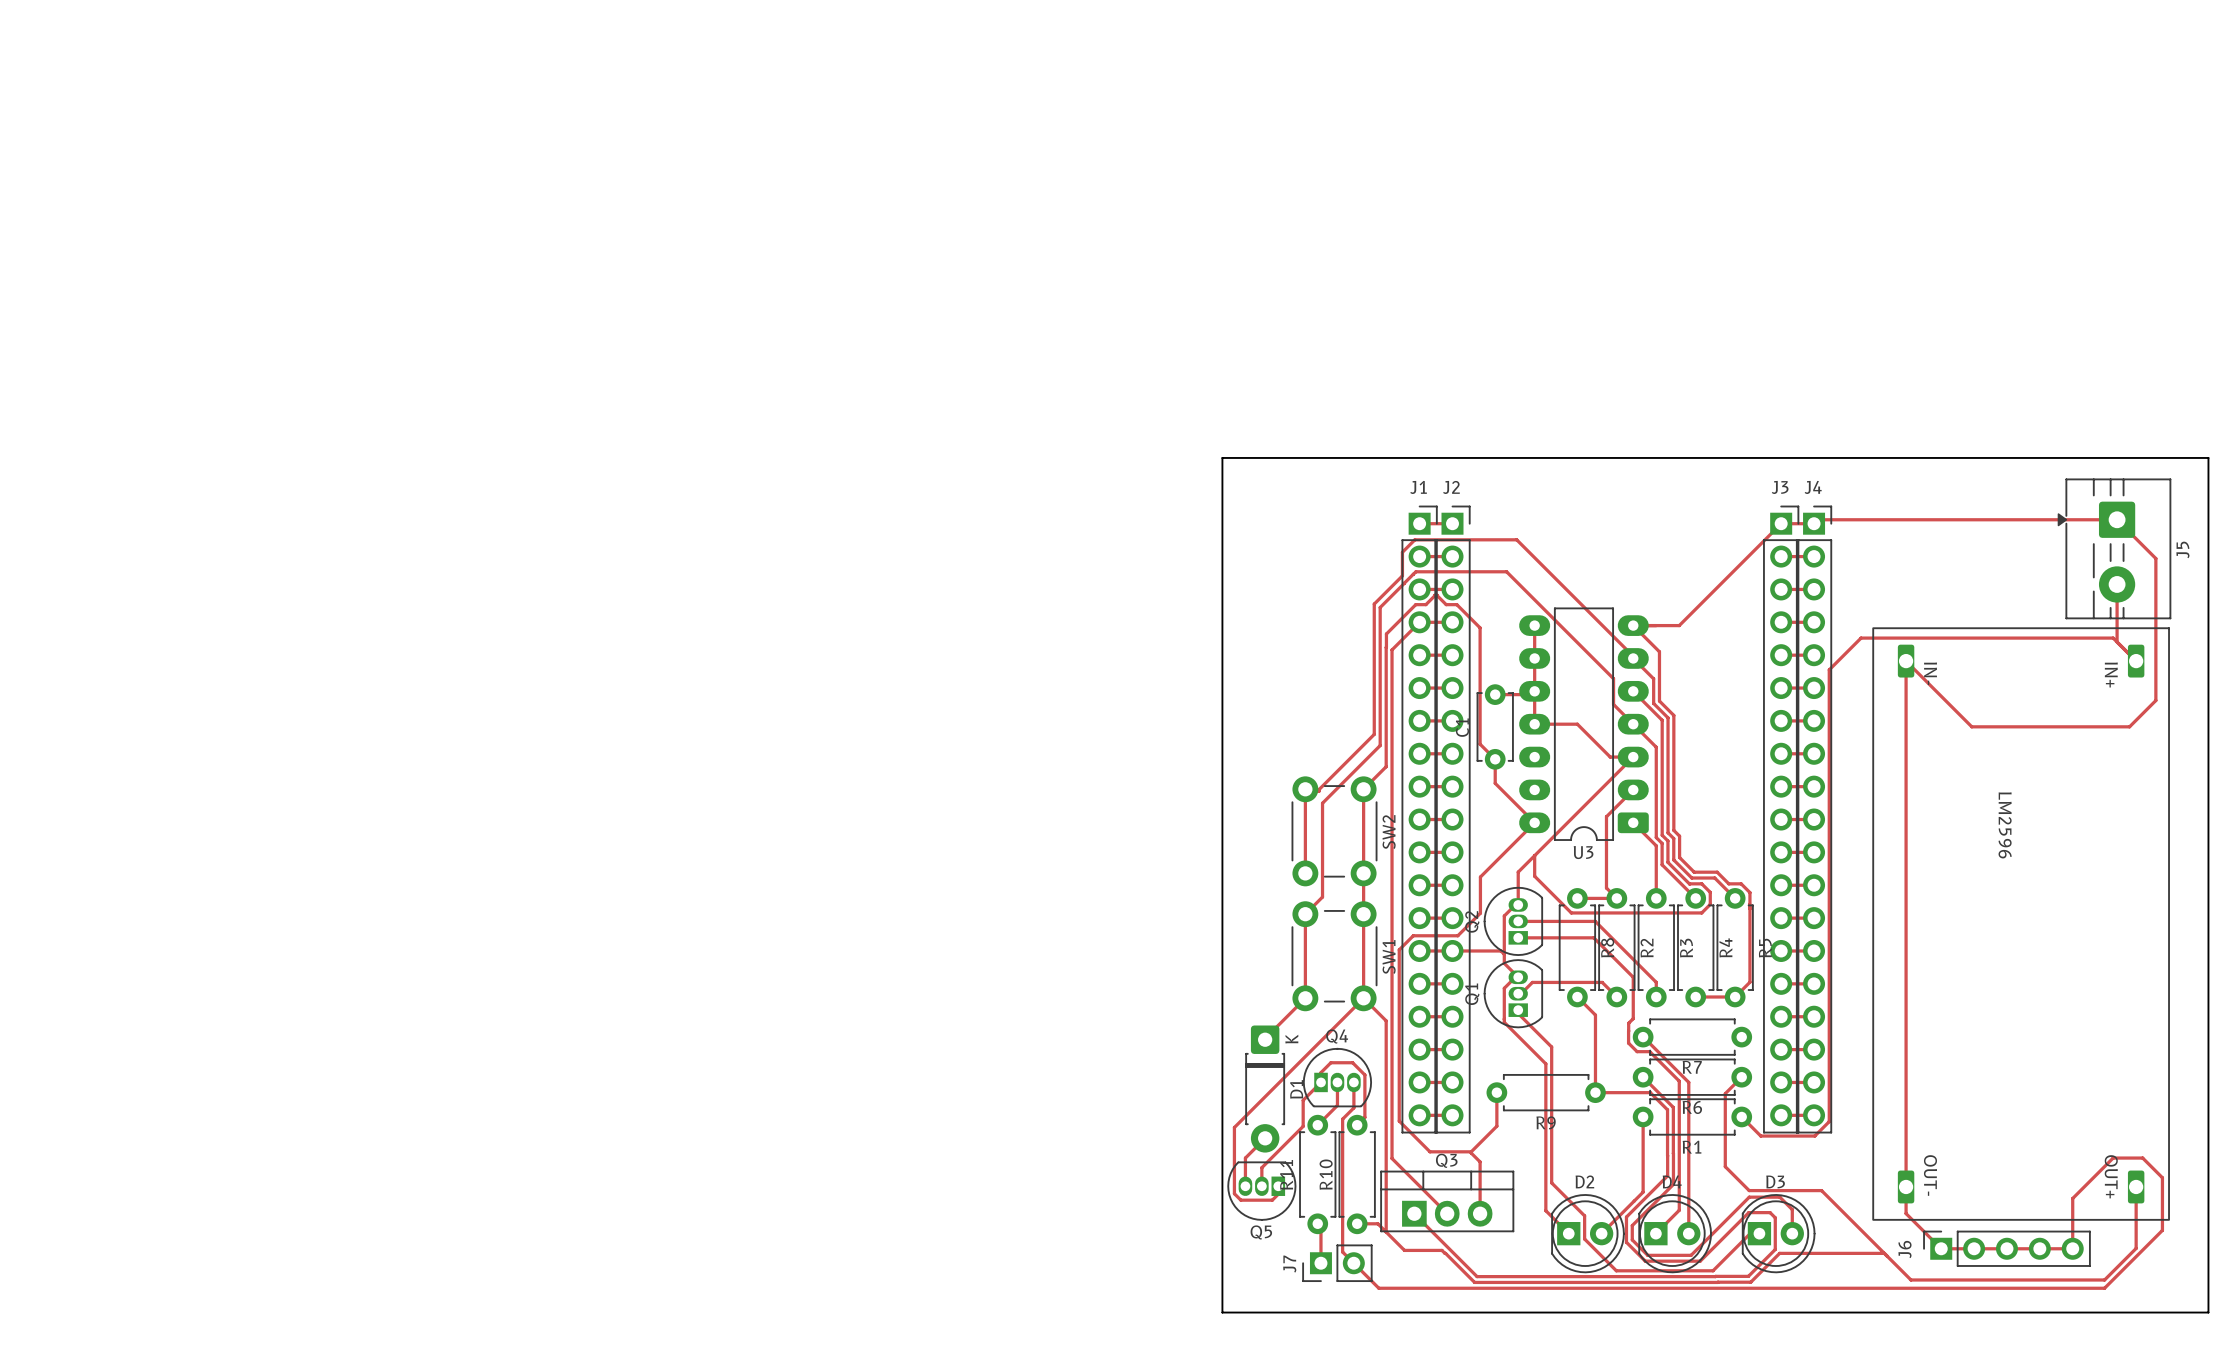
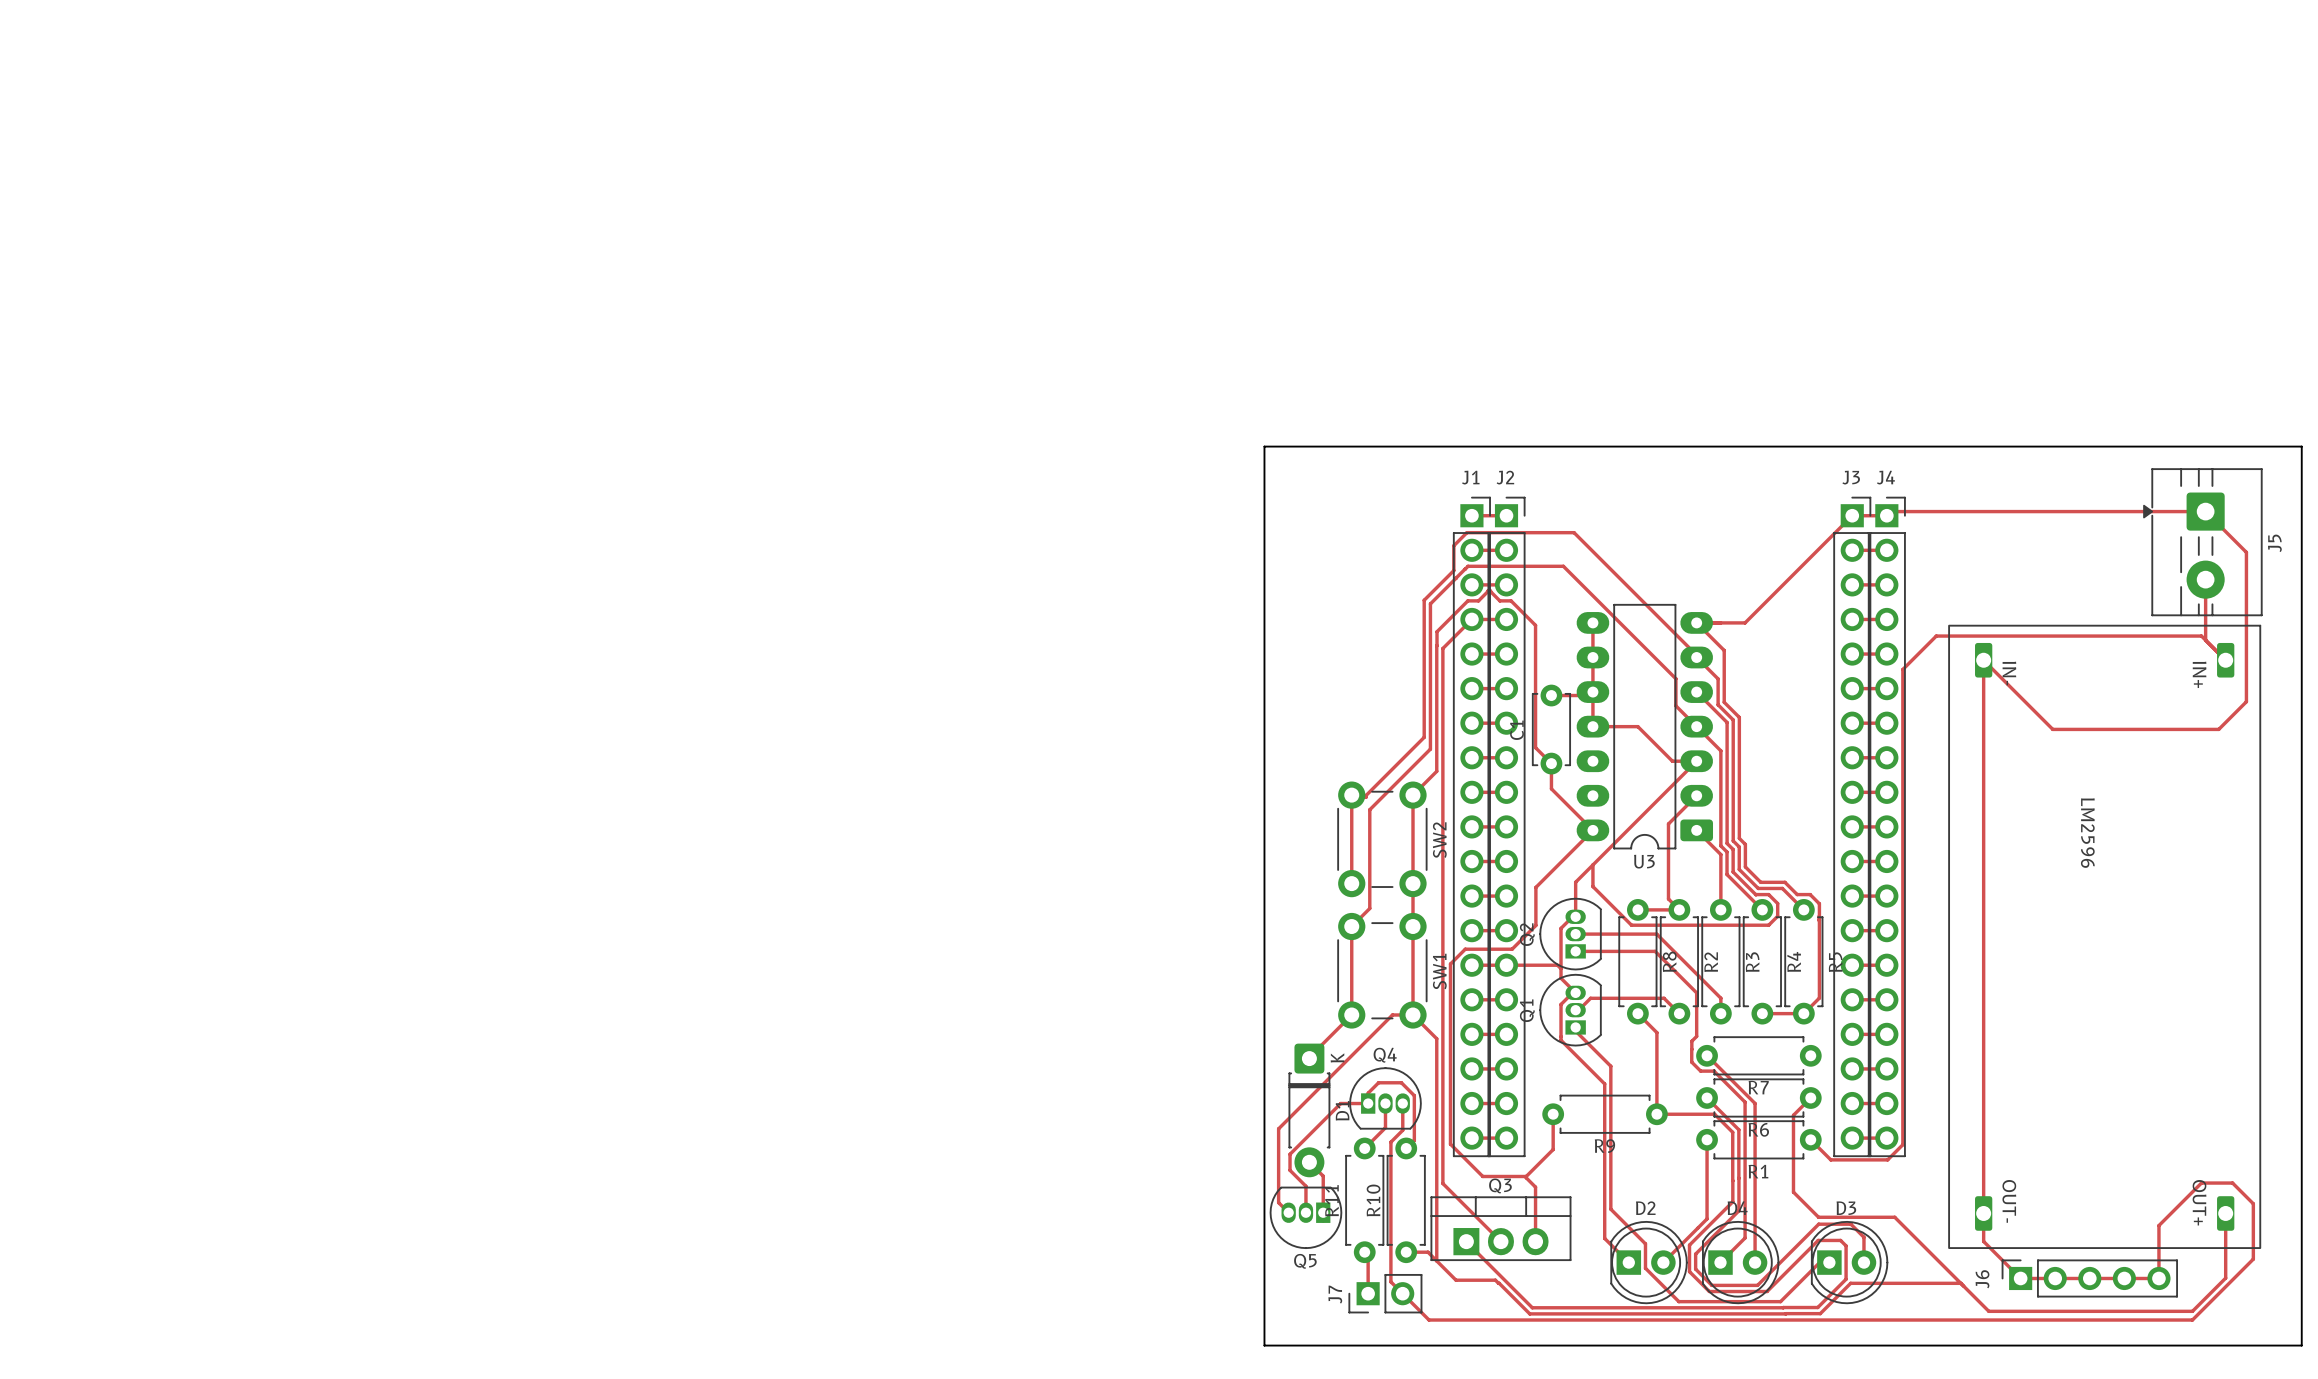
track: (1363, 998) (1234, 1127) (1234, 1193) (1240, 1200) (1272, 1200) (1278, 1194) -> (1413, 1014) (1392, 1014) (1278, 1128) (1278, 1202) (1288, 1212)
track: (1321, 1082) (1303, 1100) (1303, 1126) (1261, 1167) -> (1368, 1103) (1340, 1103) (1290, 1154) (1290, 1170) (1305, 1186) (1305, 1193)
track: (1265, 1138) (1245, 1158) (1245, 1186) -> (1309, 1162) (1323, 1176) (1323, 1212)

